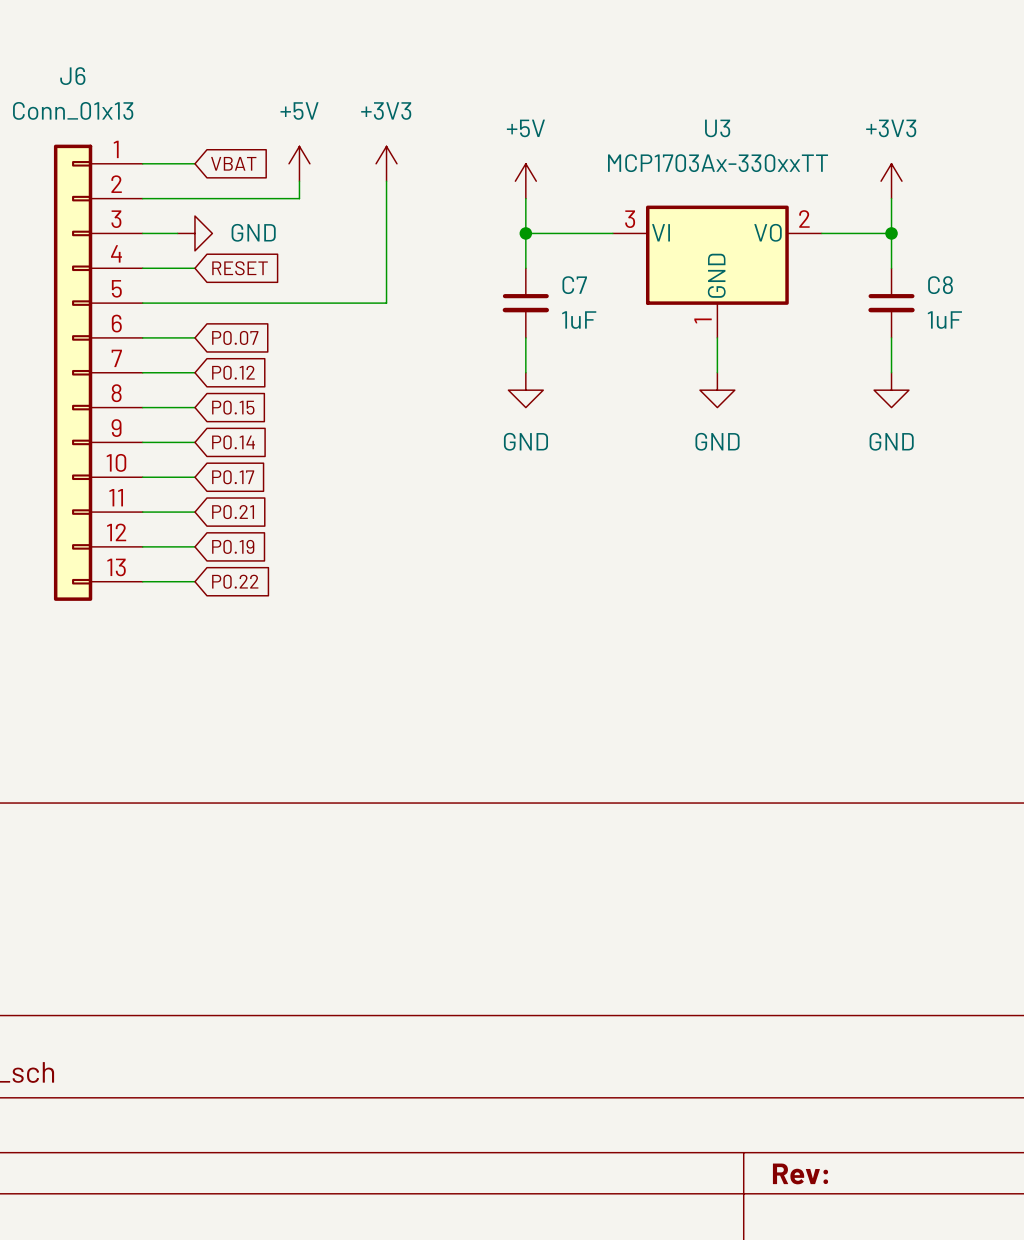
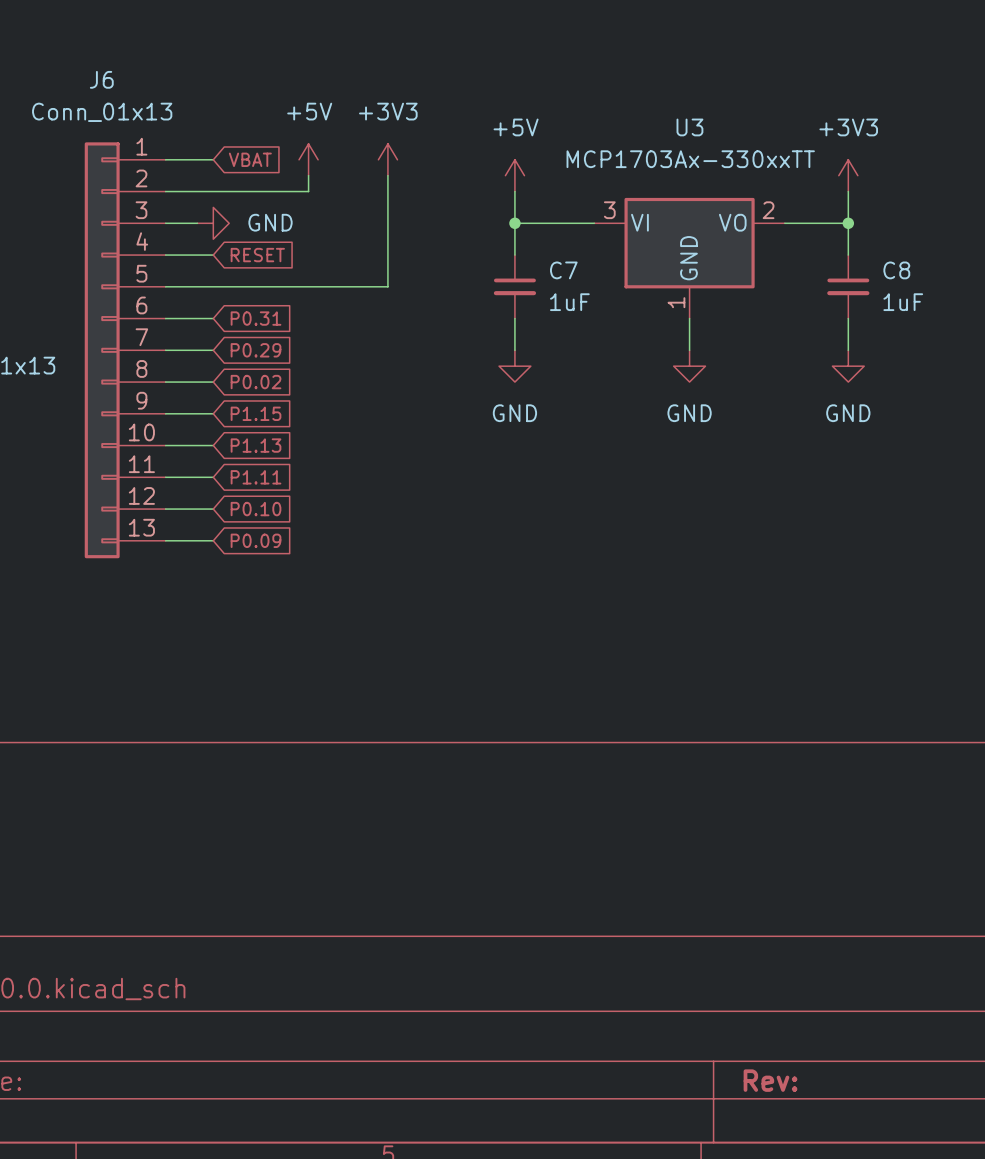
global label: P0.07 (235, 337) -> P0.31 (256, 318)
global label: P0.12 (233, 372) -> P0.29 (256, 350)
global label: P0.15 (233, 407) -> P0.02 (256, 382)
global label: P0.14 (233, 442) -> P1.15 (256, 413)
global label: P0.17 (233, 477) -> P1.13 (256, 445)
global label: P0.21 (233, 512) -> P1.11 (256, 477)
global label: P0.19 (233, 546) -> P0.10 (256, 509)
global label: P0.22 (235, 581) -> P0.09 (256, 540)

